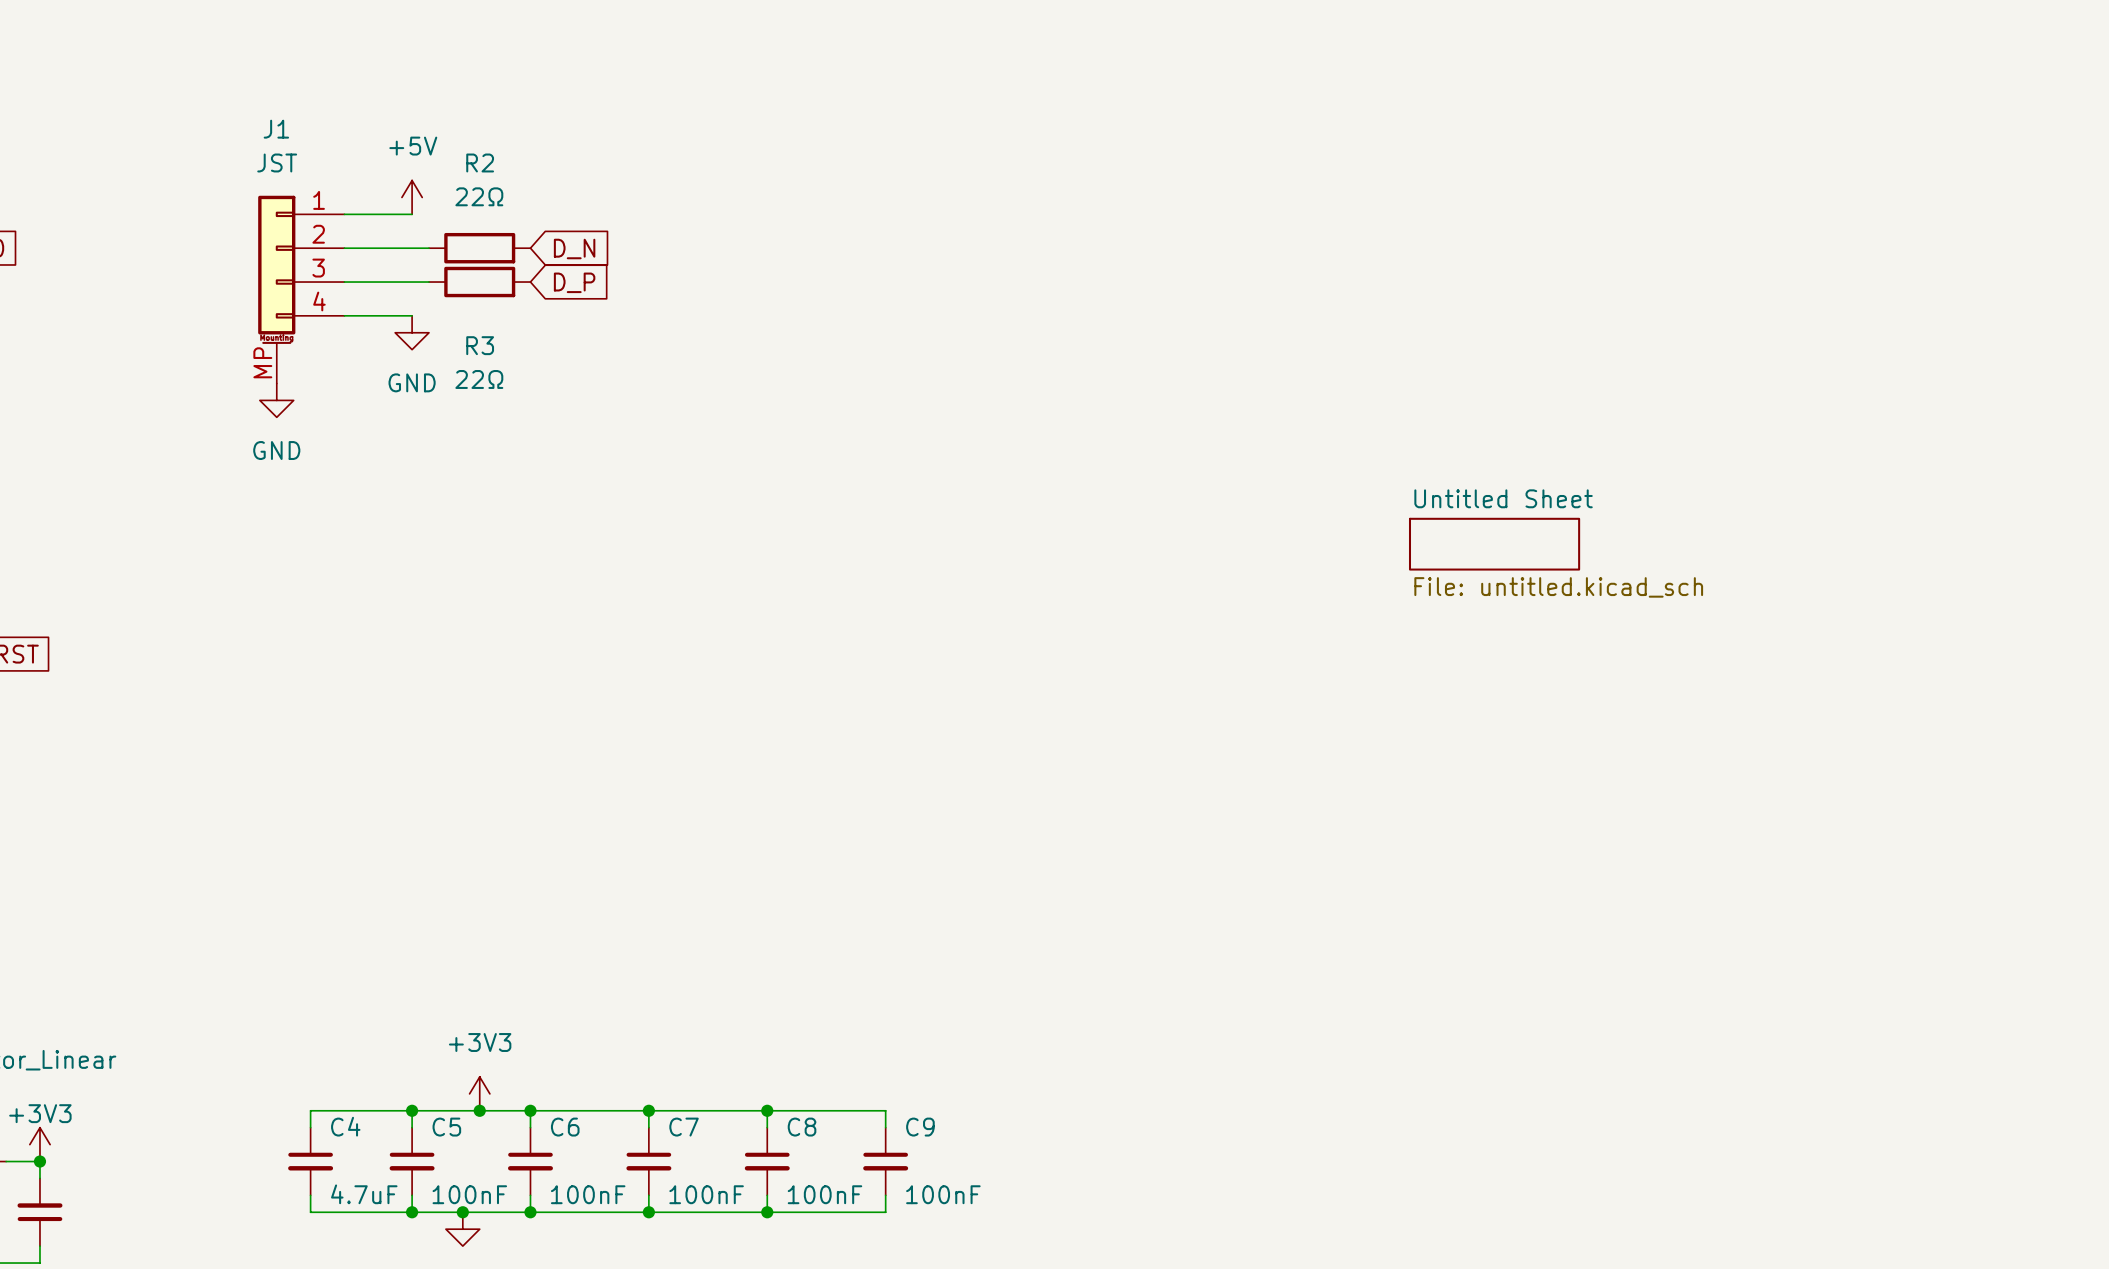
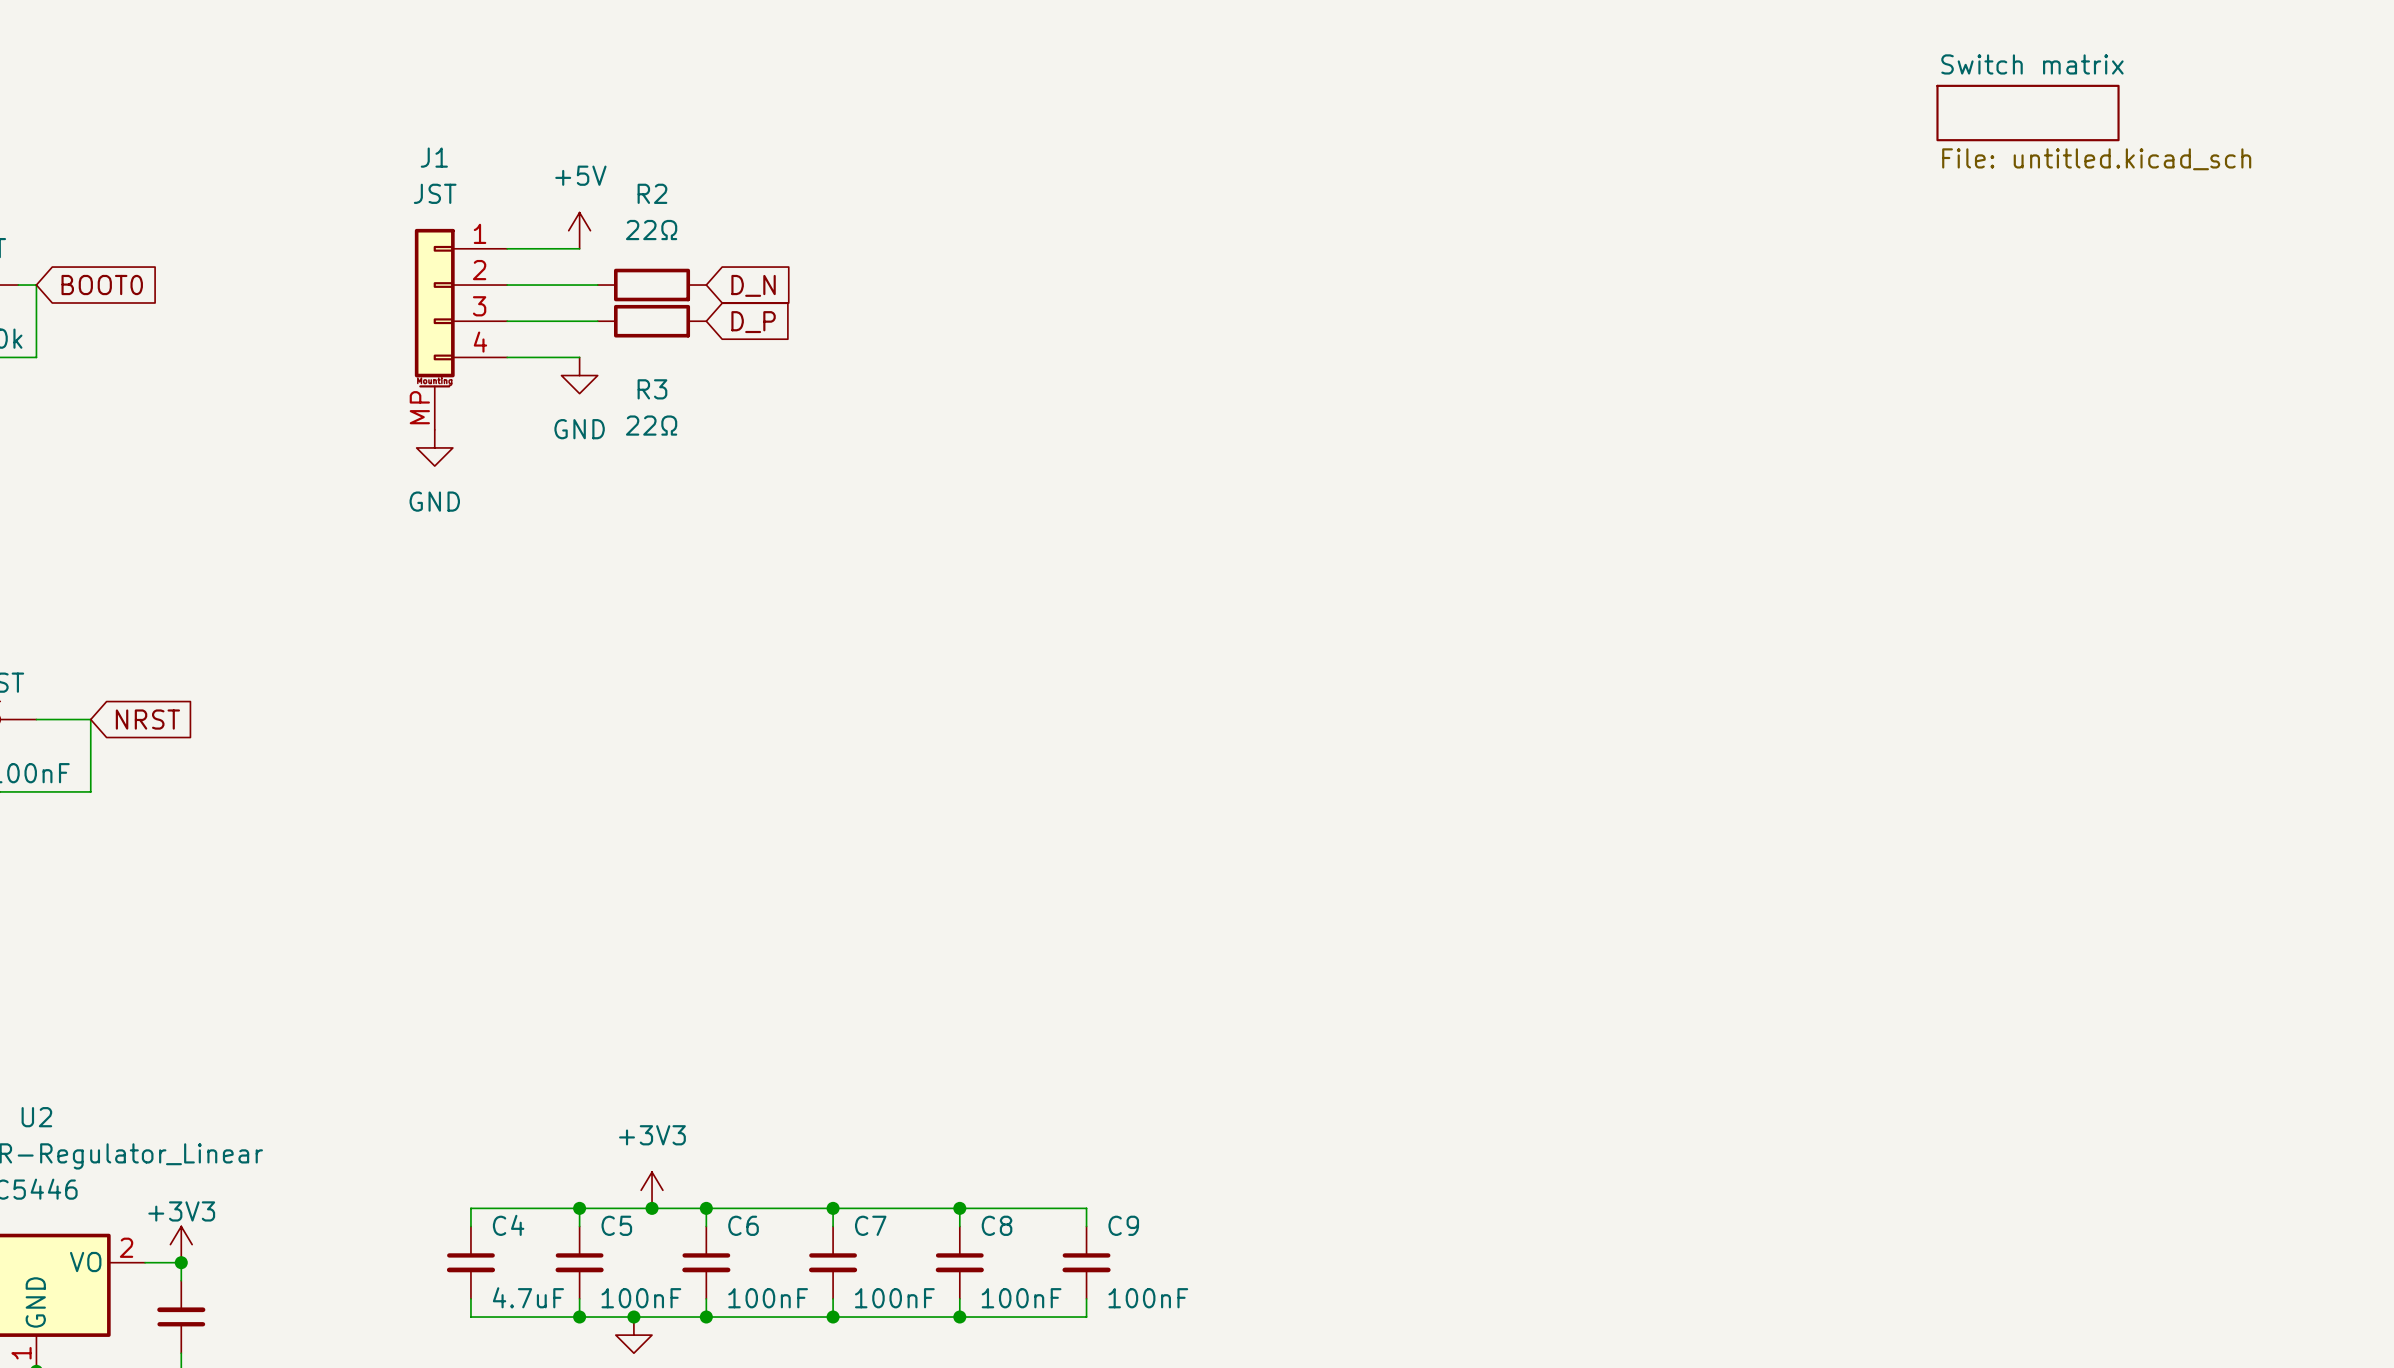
sheet Switch matrix: none -> File: untitled.kicad_sch (2028, 113)
sheet Untitled Sheet: File: untitled.kicad_sch (1494, 544) -> none

